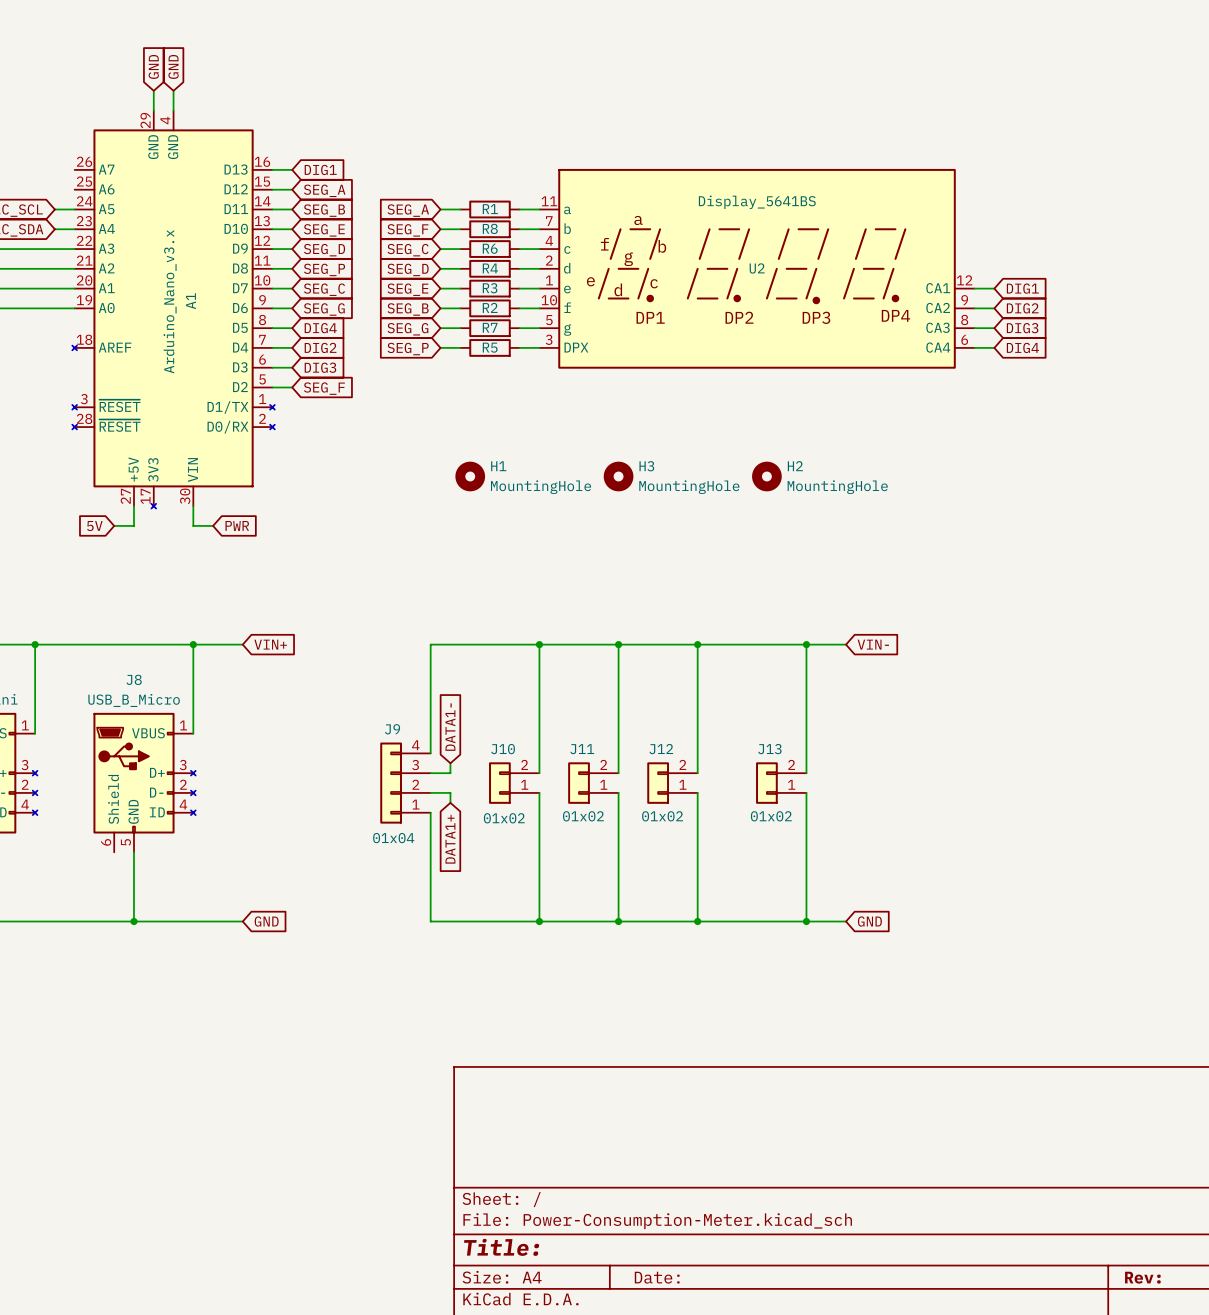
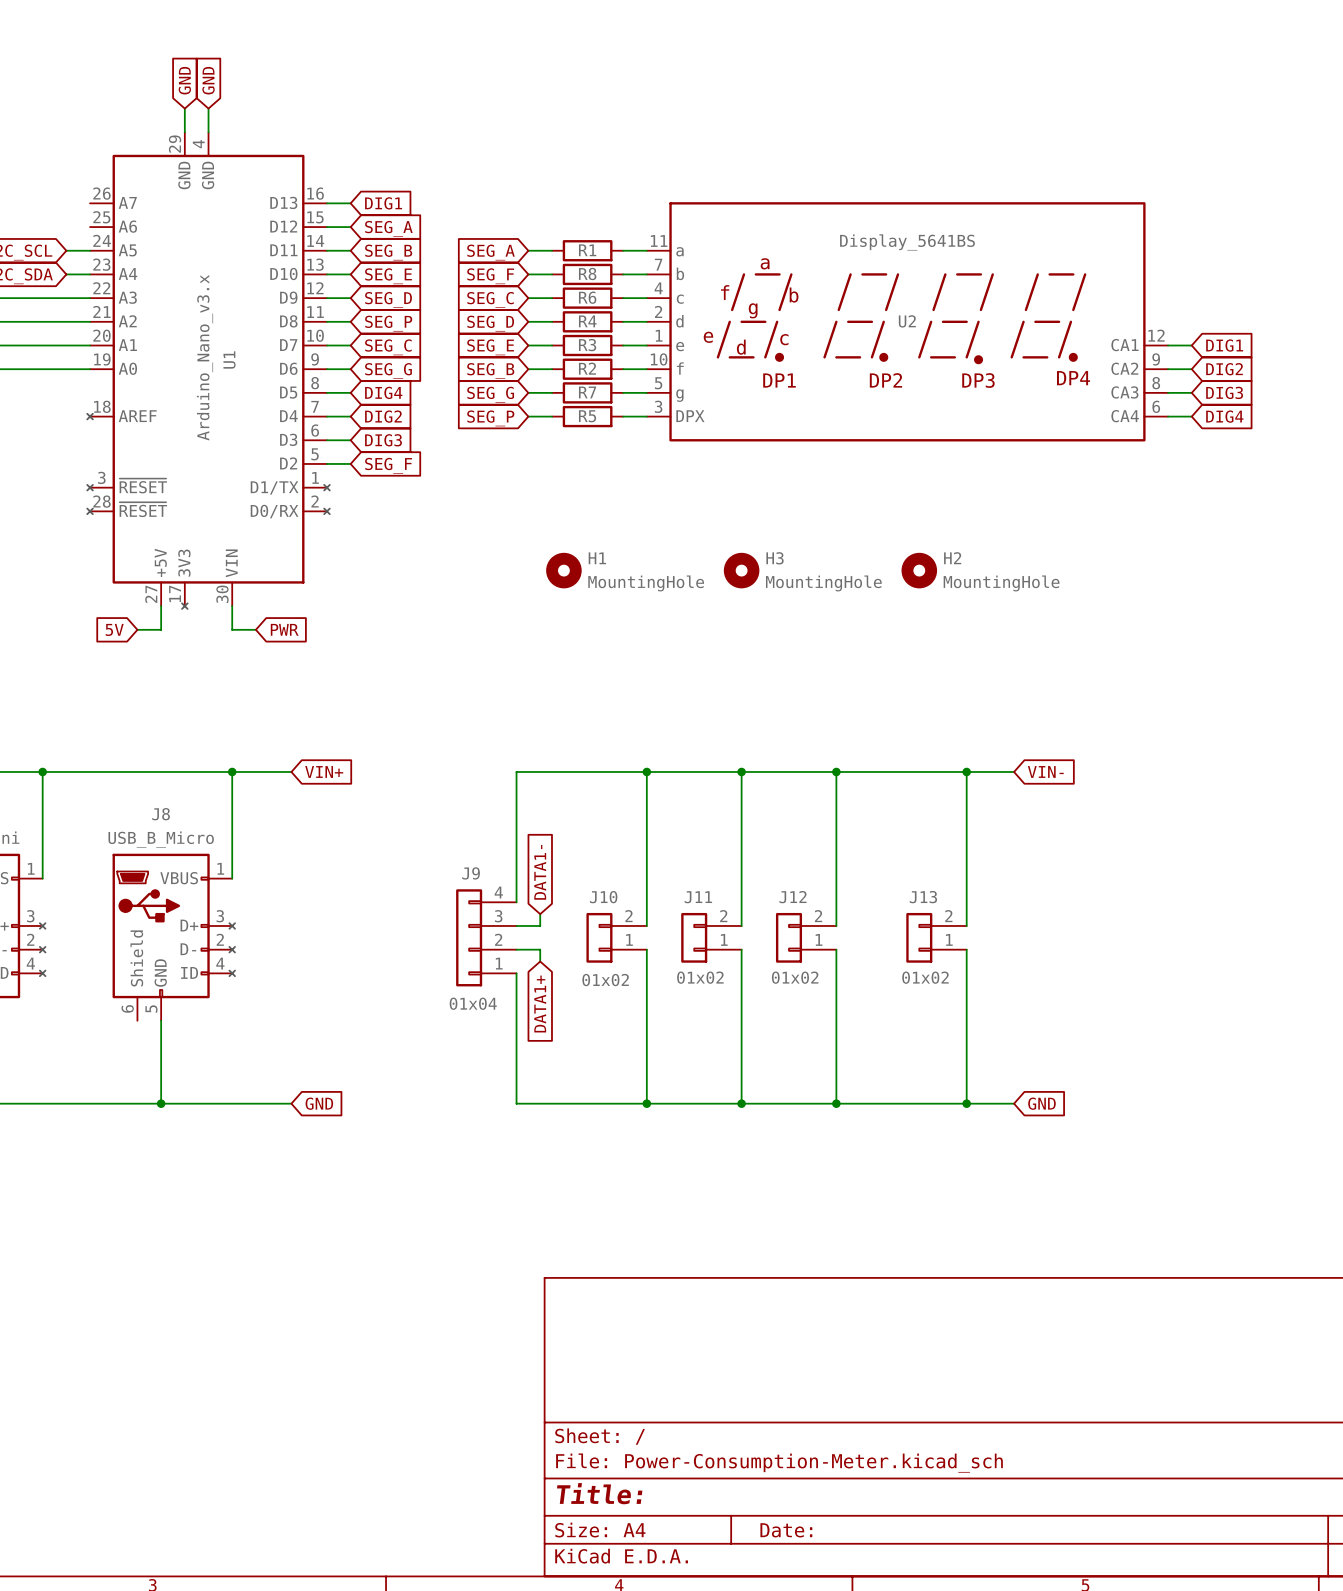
A1 name: A1 (190, 301) -> U1 (229, 360)

